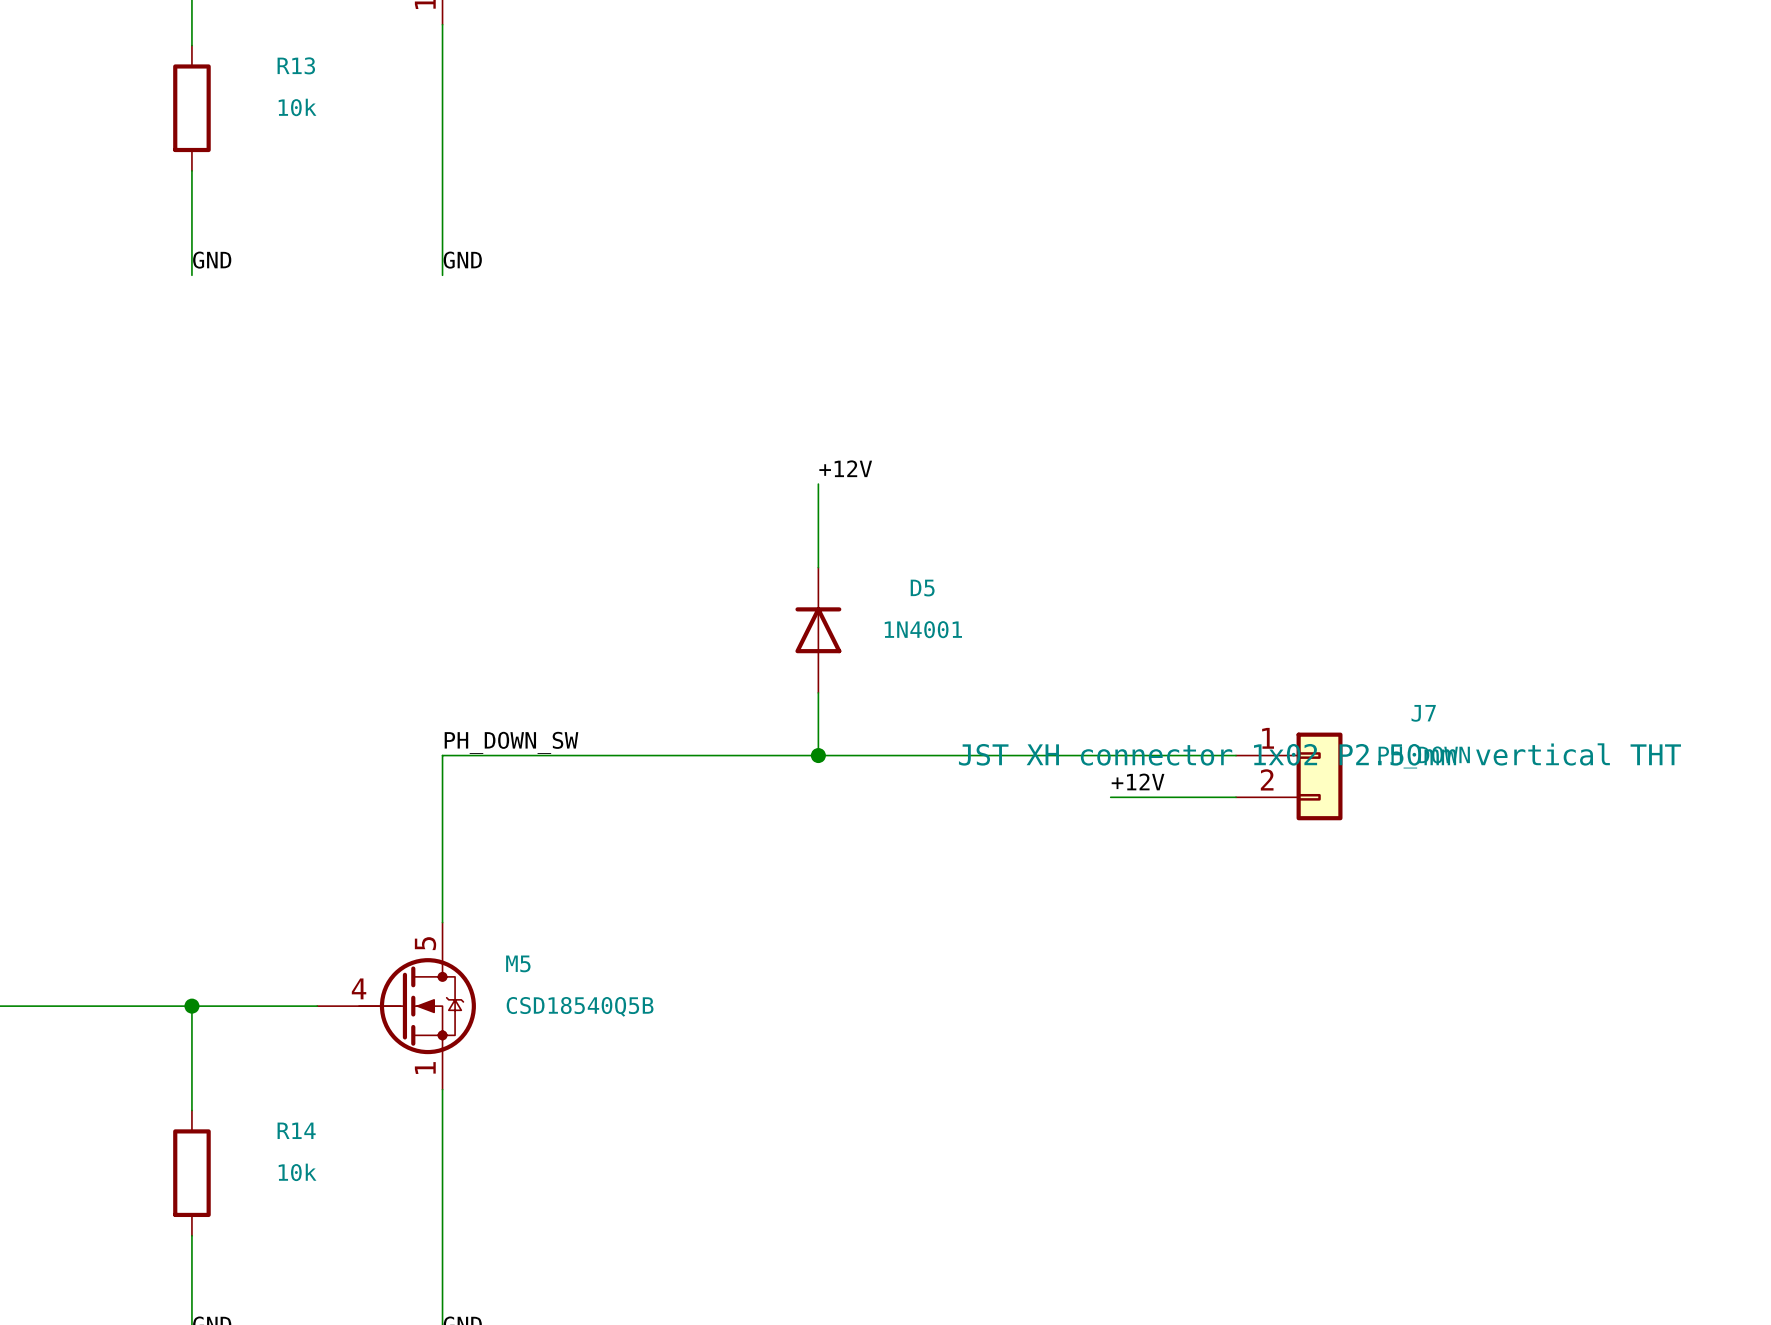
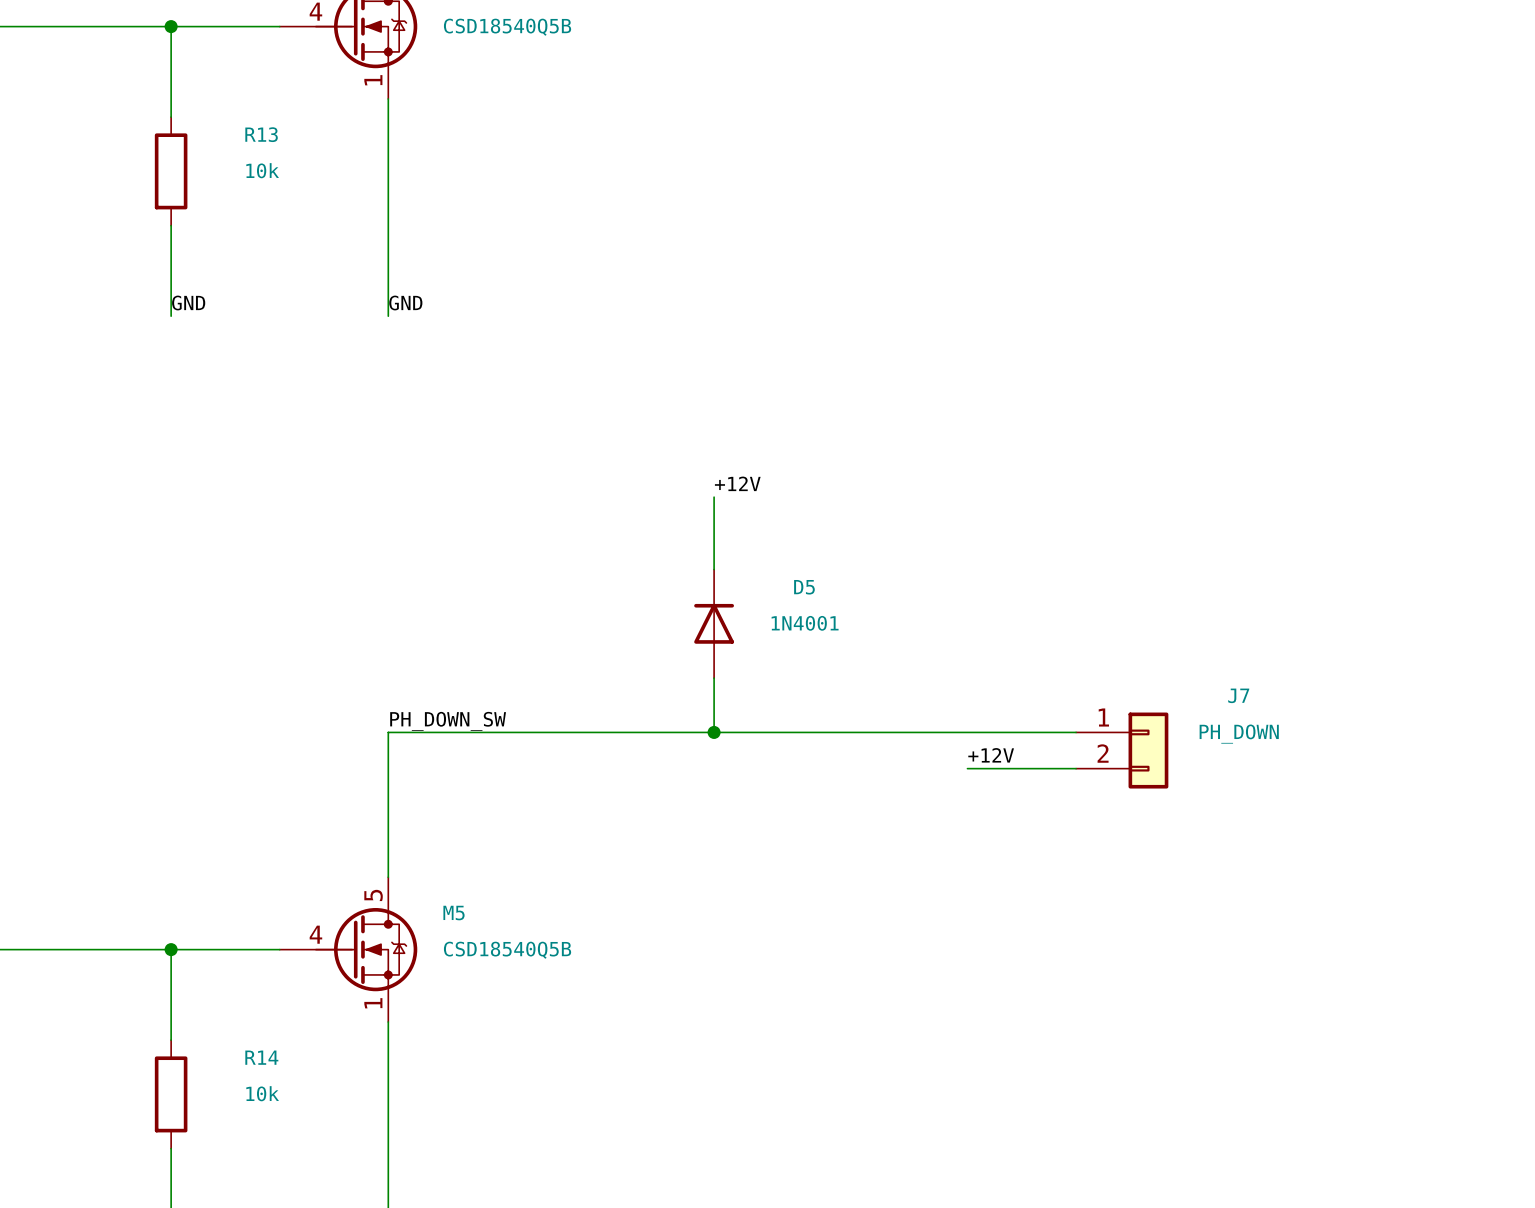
J7 text: JST XH connector 1x02 P2.50mm vertical THT (1319, 754) -> none

